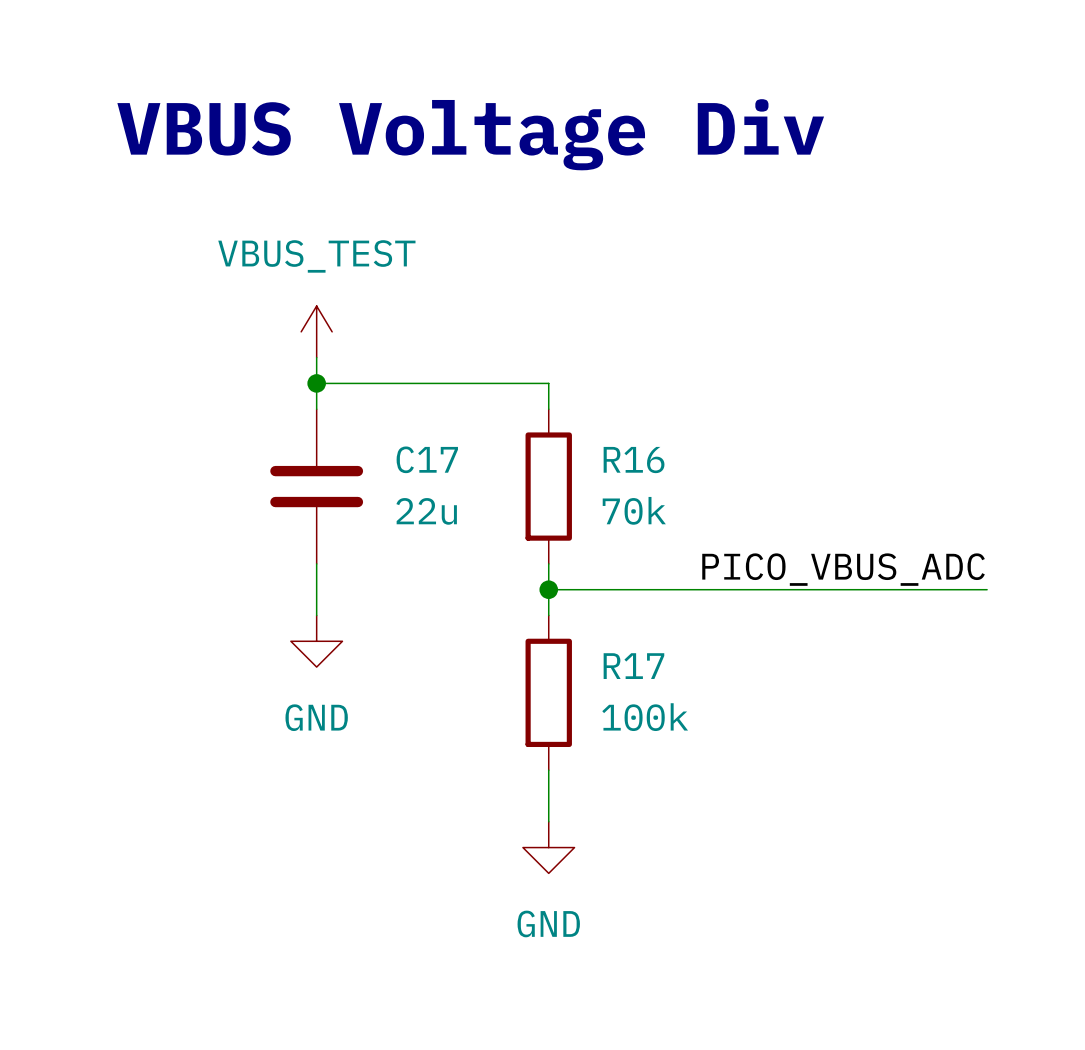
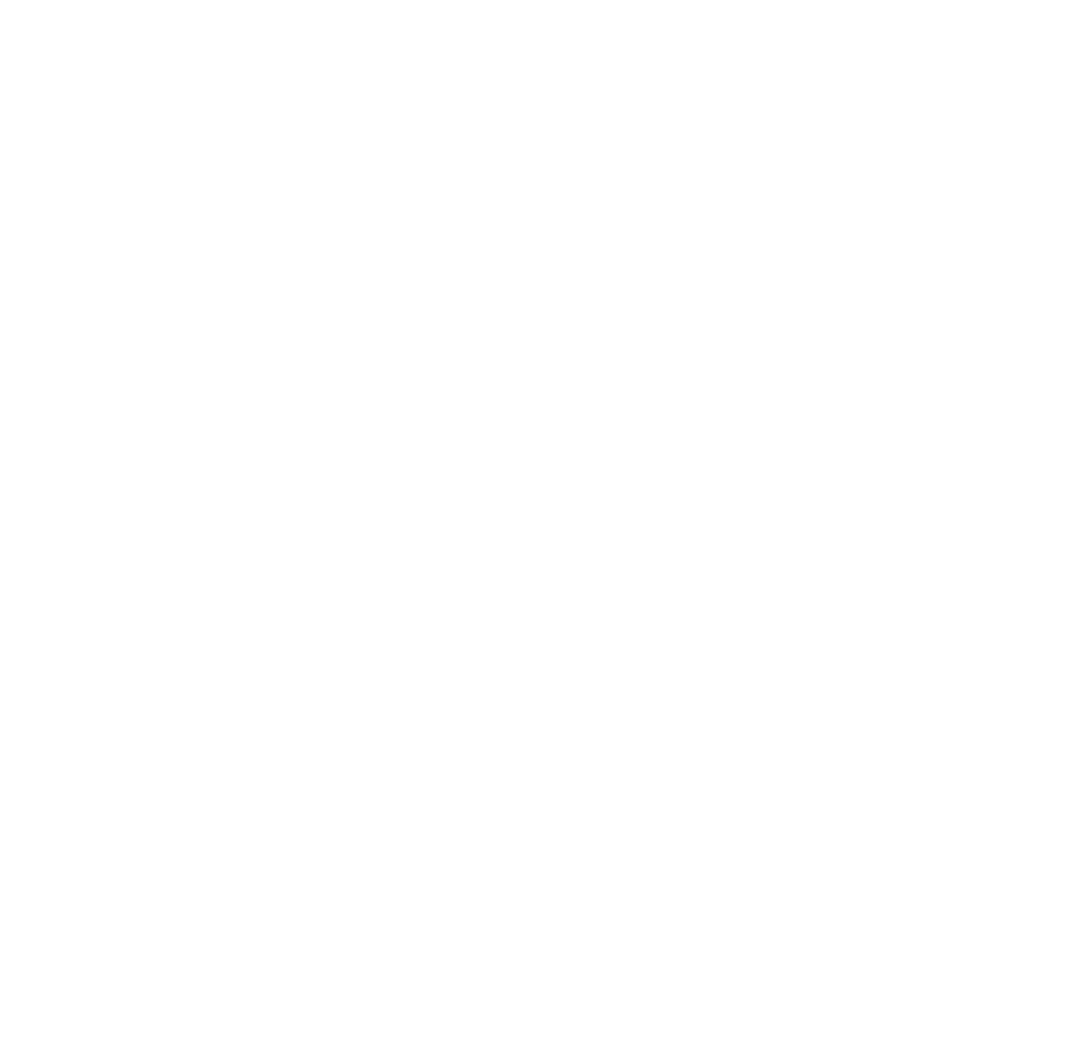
text: VBUS Voltage Div (470, 134) -> none
power symbol: VBUS_TEST (316, 331) -> none
wire: (316, 357) (316, 409) -> none
wire: (316, 383) (548, 383) (548, 409) -> none
junction: (316, 383) -> none
C17: 22u (316, 486) -> none
R16: 70k (548, 486) -> none
wire: (316, 563) (316, 615) -> none
wire: (548, 563) (548, 615) -> none
label: PICO_VBUS_ADC (843, 569) -> none
wire: (548, 589) (987, 589) -> none
junction: (548, 589) -> none
power symbol: GND (316, 641) -> none
R17: 100k (548, 692) -> none
wire: (548, 770) (548, 821) -> none
power symbol: GND (548, 847) -> none

